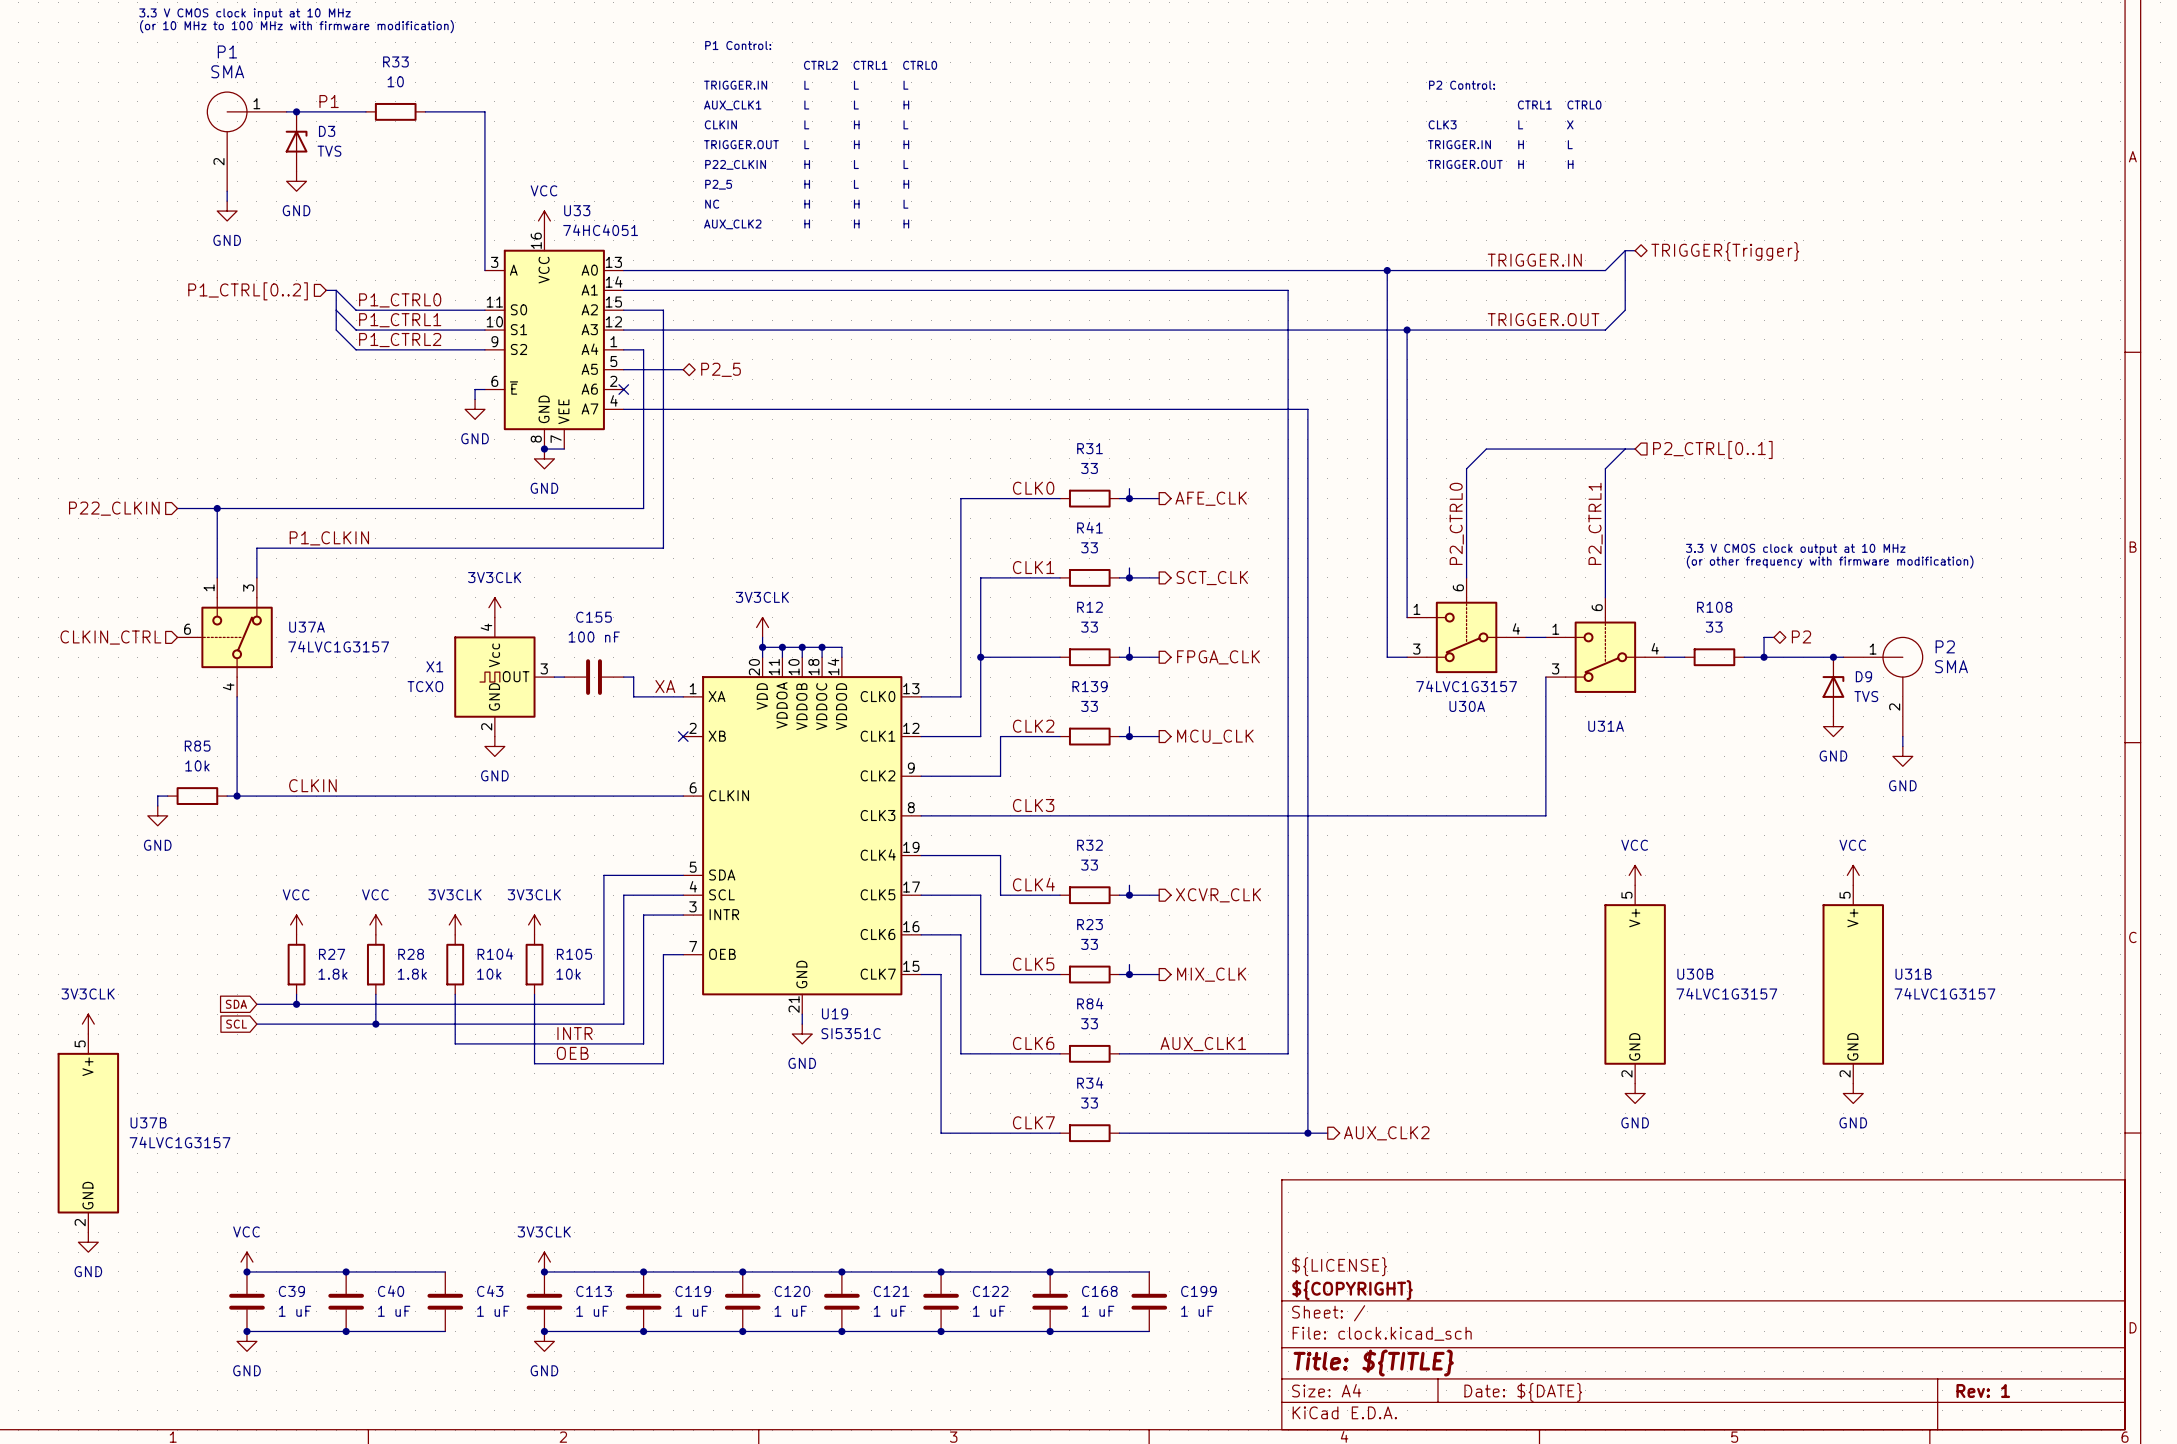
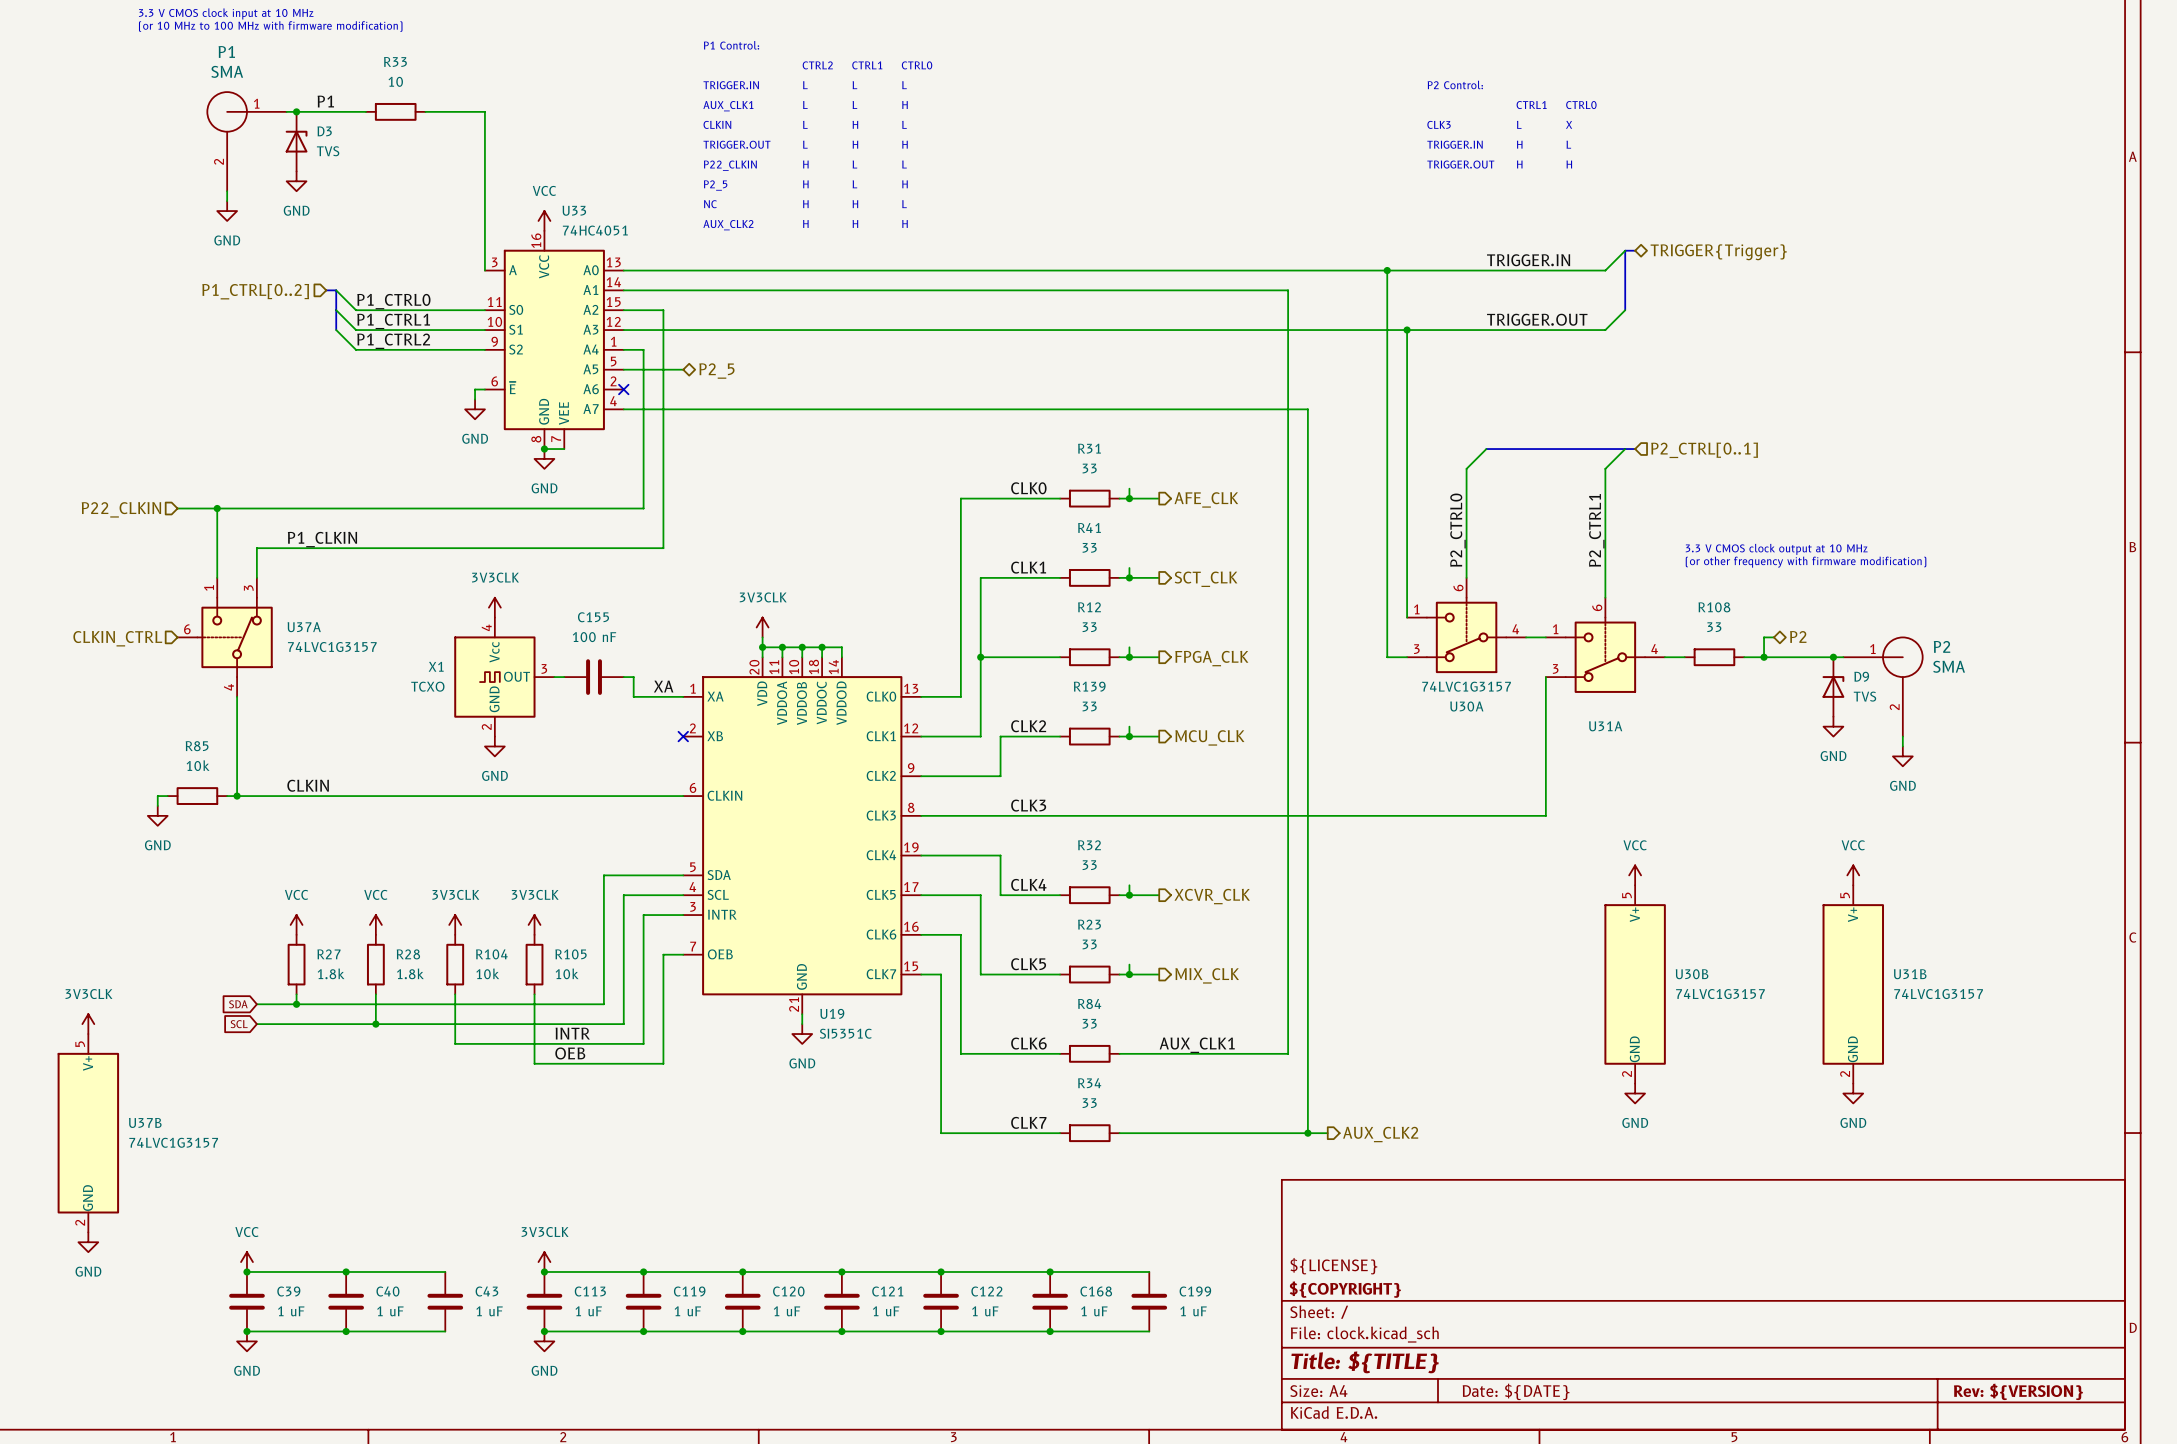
title block: Rev: 1 (1983, 1391) -> Rev: ${VERSION} (2018, 1391)

